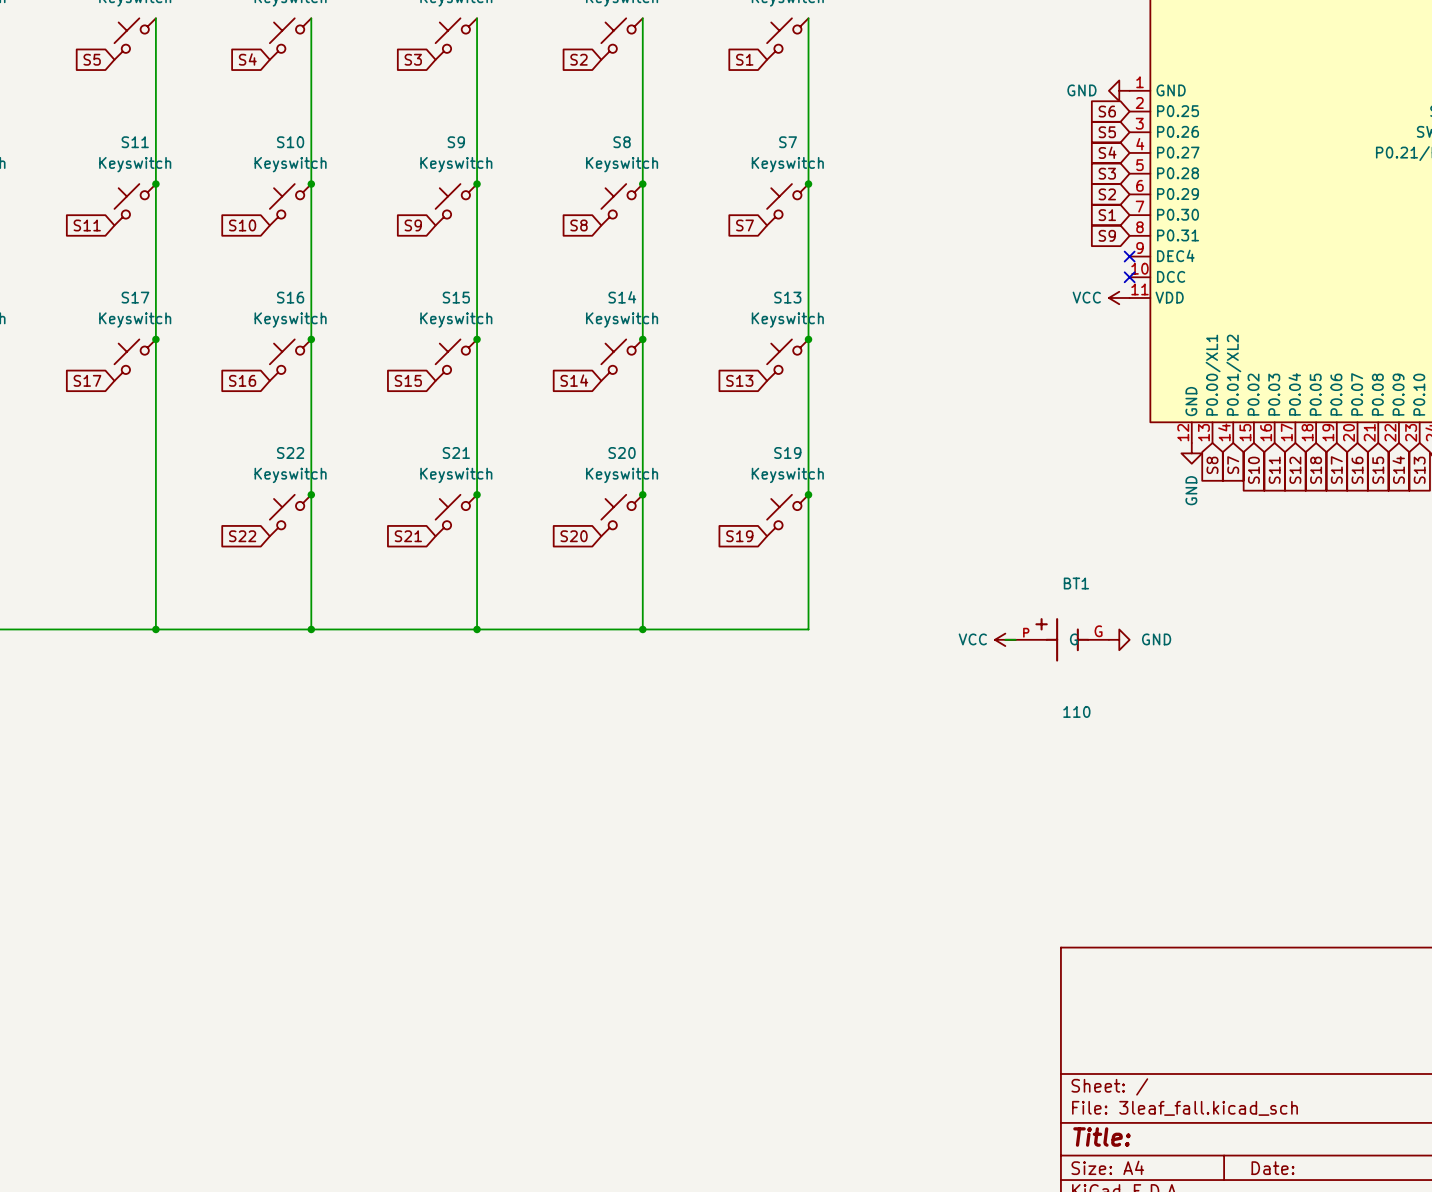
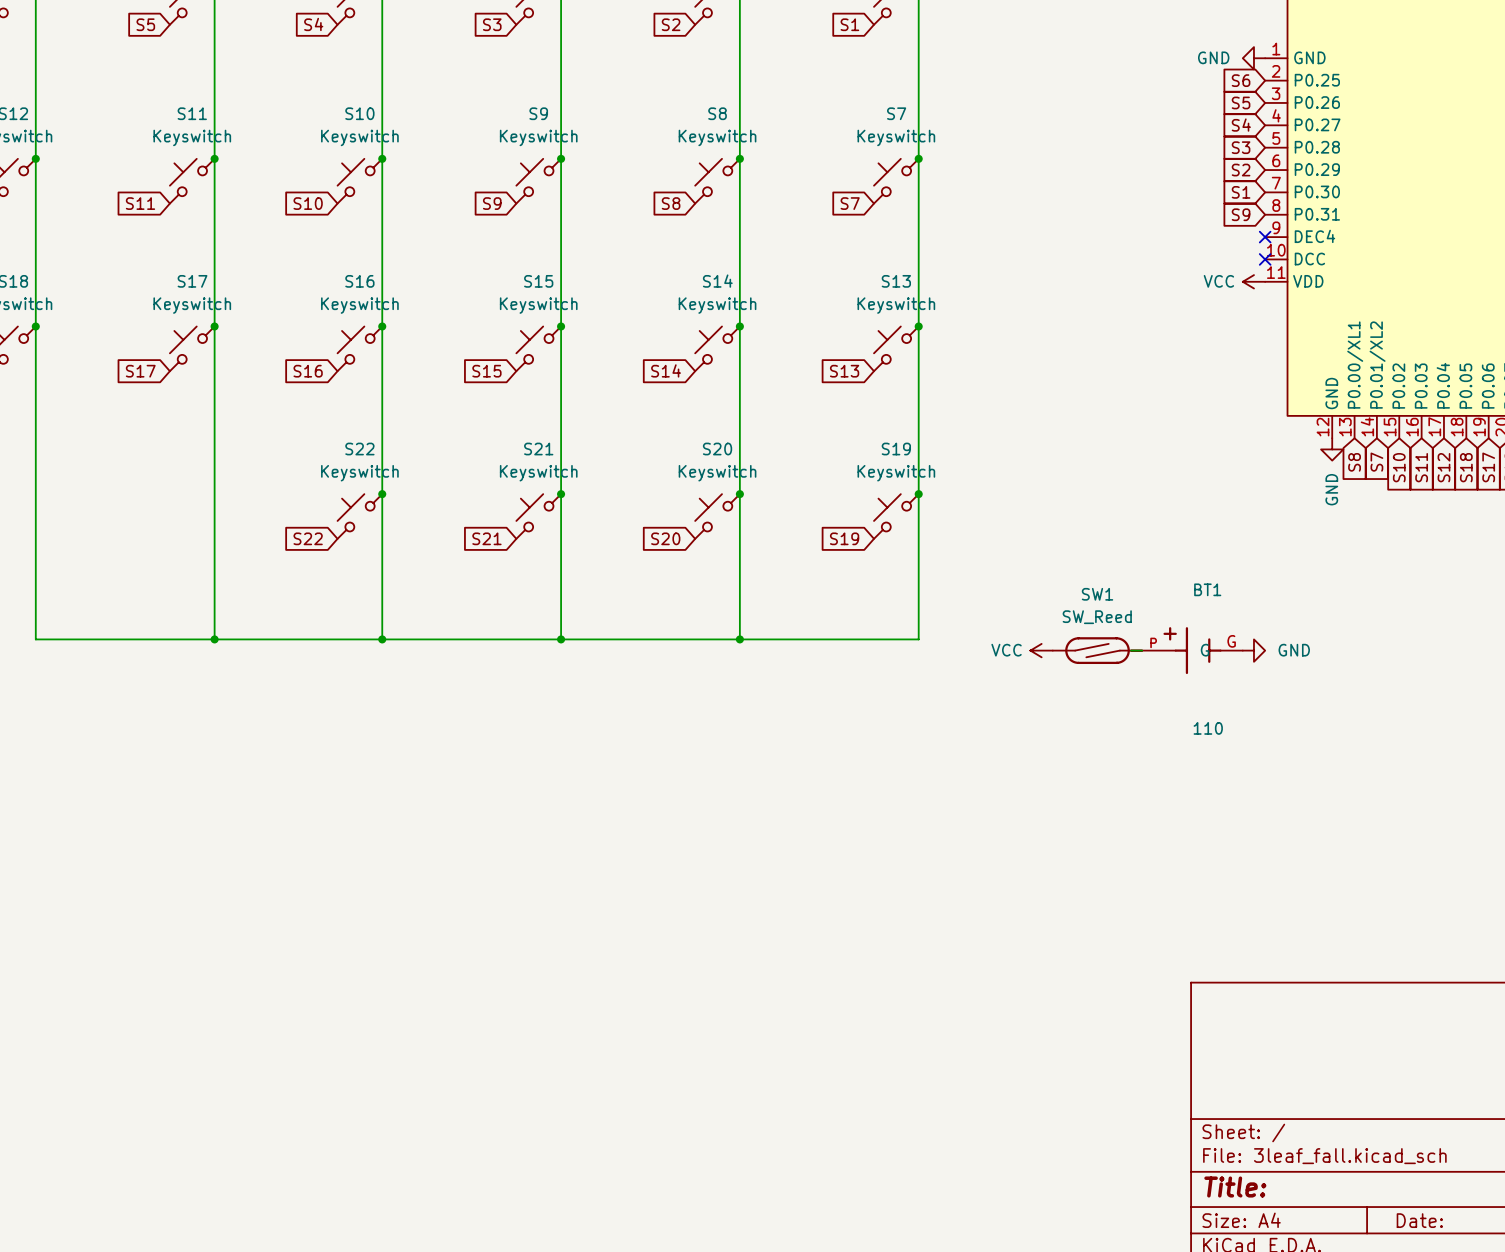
SW1: none -> SW_Reed (1097, 650)
power symbol position: VCC (1005, 639) -> VCC (1041, 650)

